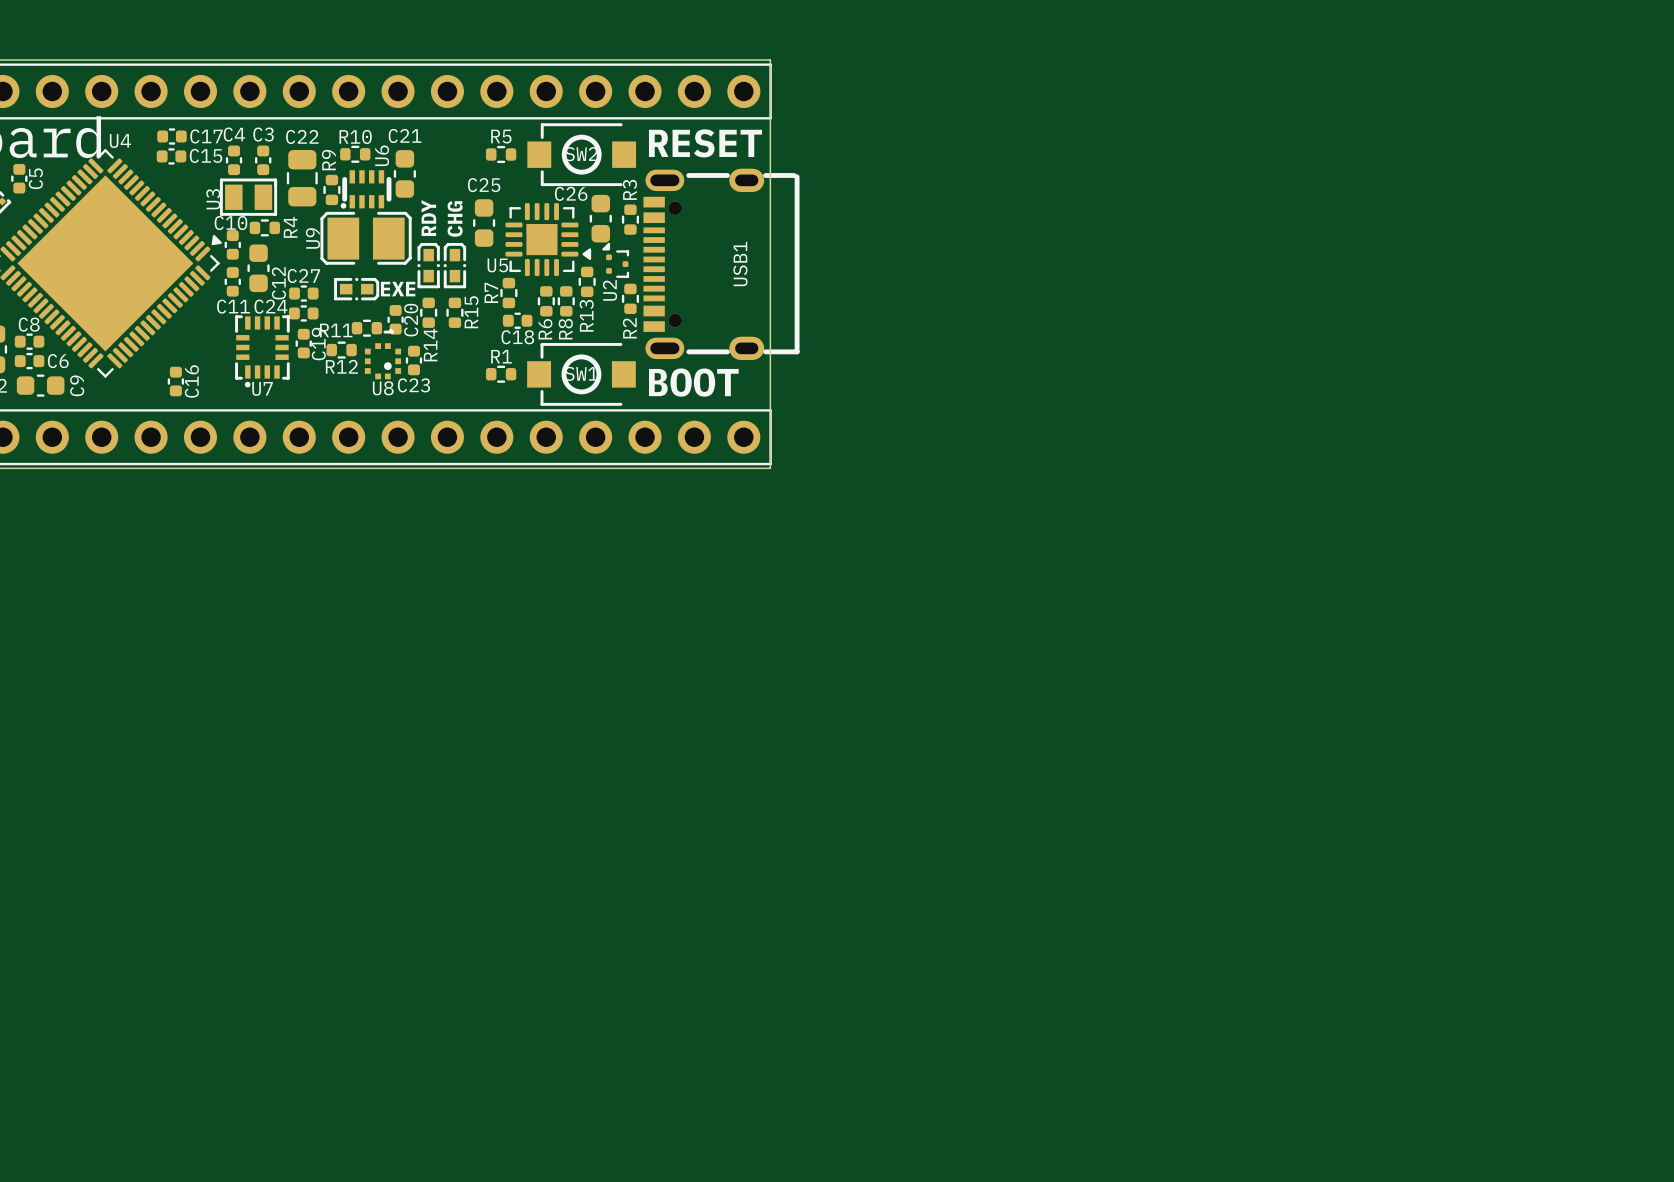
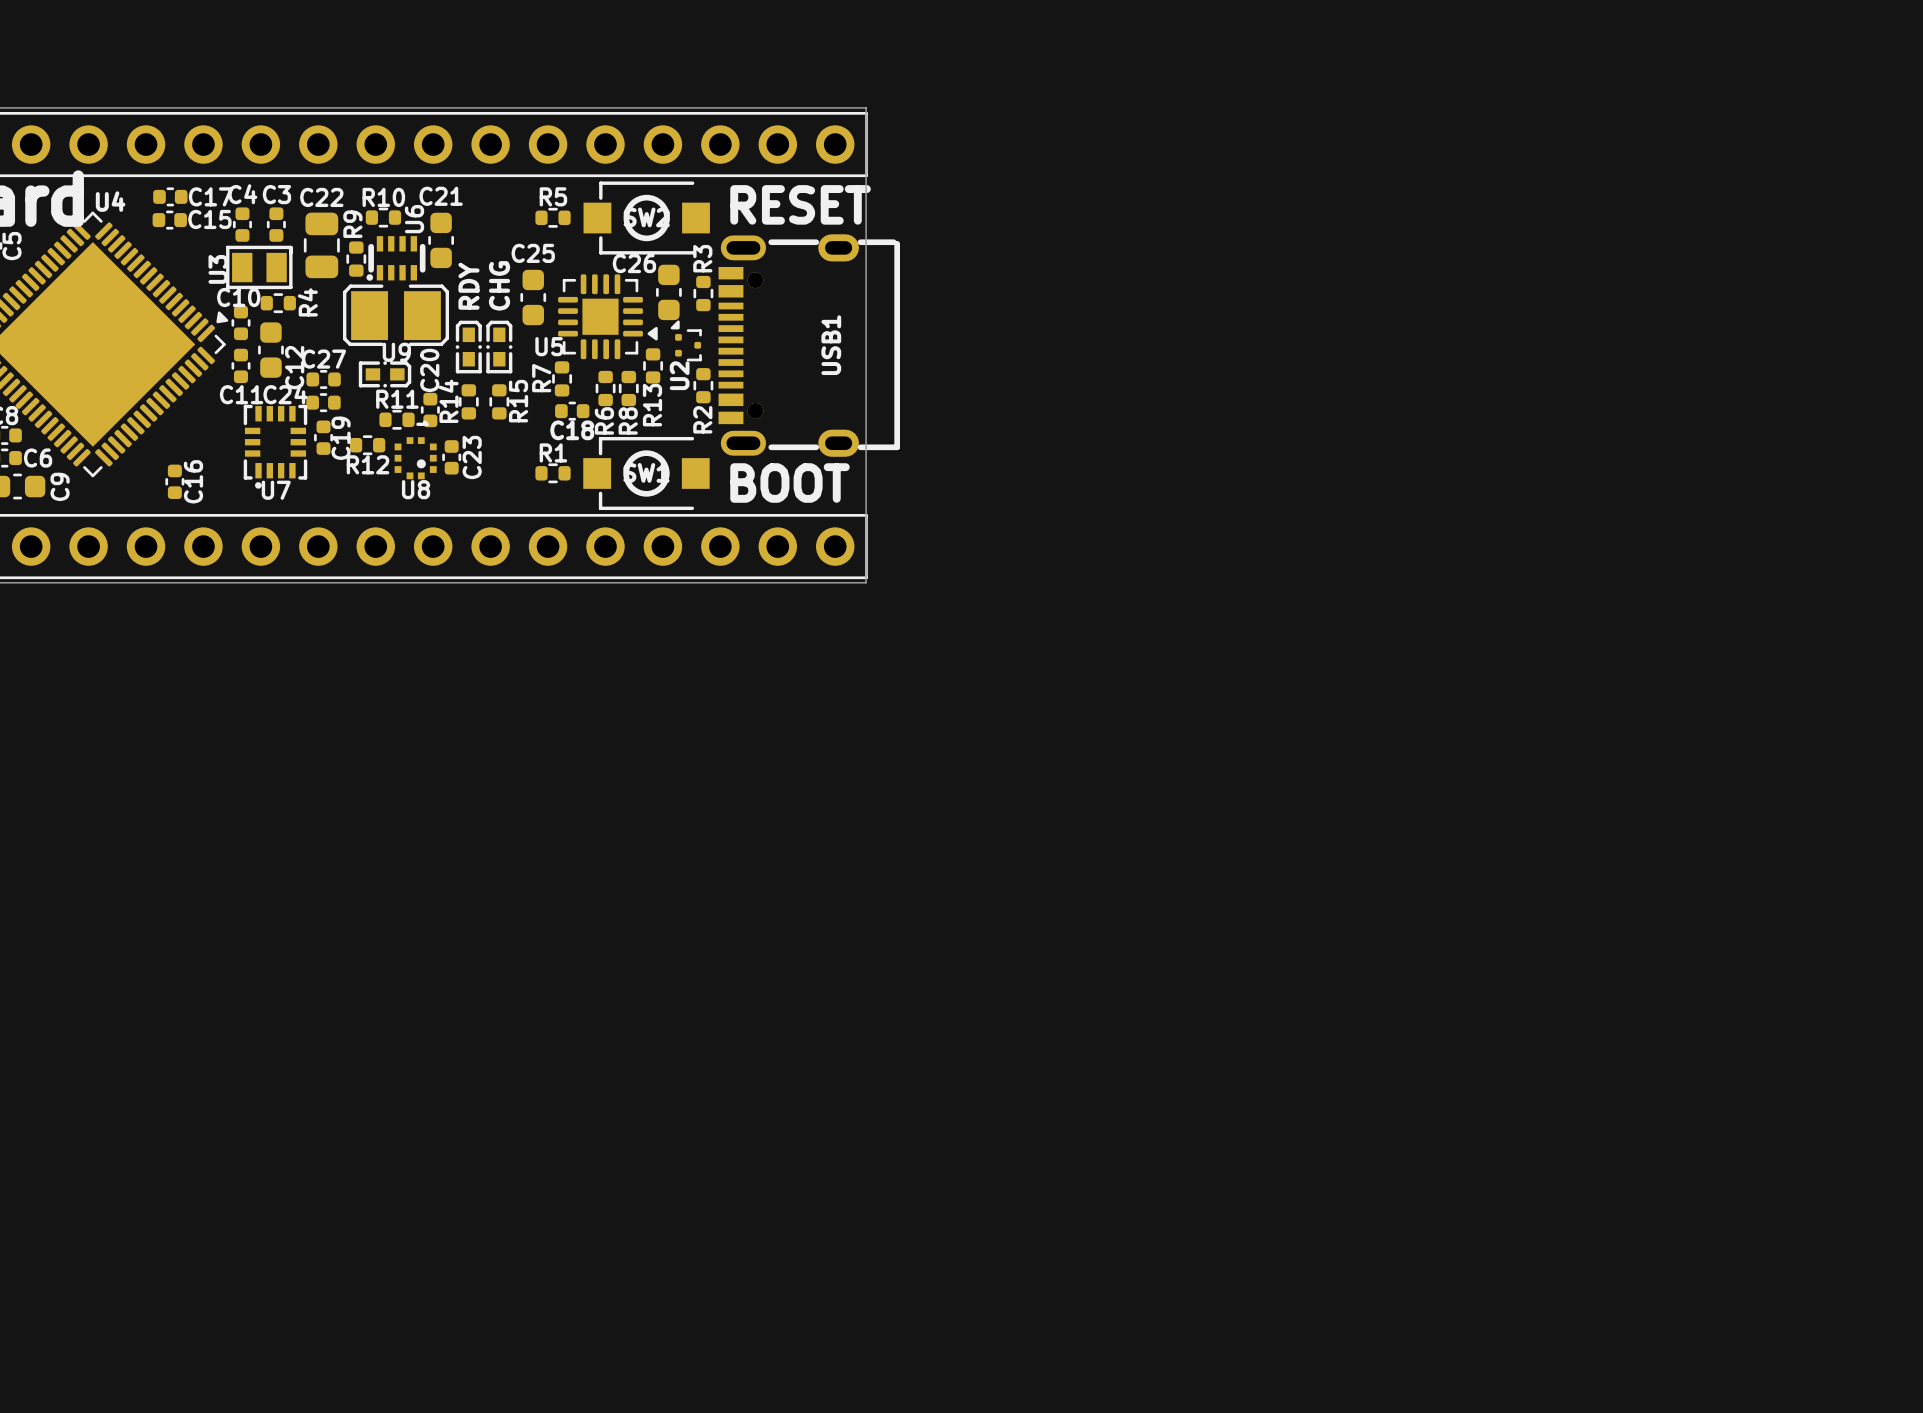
U9 name rotation: 0° (312, 238) -> 90° clockwise (396, 352)
U9 name position: U9 (312, 238) -> U9 (396, 352)
text: EXE (398, 289) -> none
C20 name position: C20 (411, 320) -> C20 (429, 370)
R11 name position: R11 (336, 330) -> R11 (397, 399)
R14 name position: R14 (430, 345) -> R14 (448, 401)
C23 name rotation: 0° (413, 385) -> 90° counterclockwise (472, 457)

